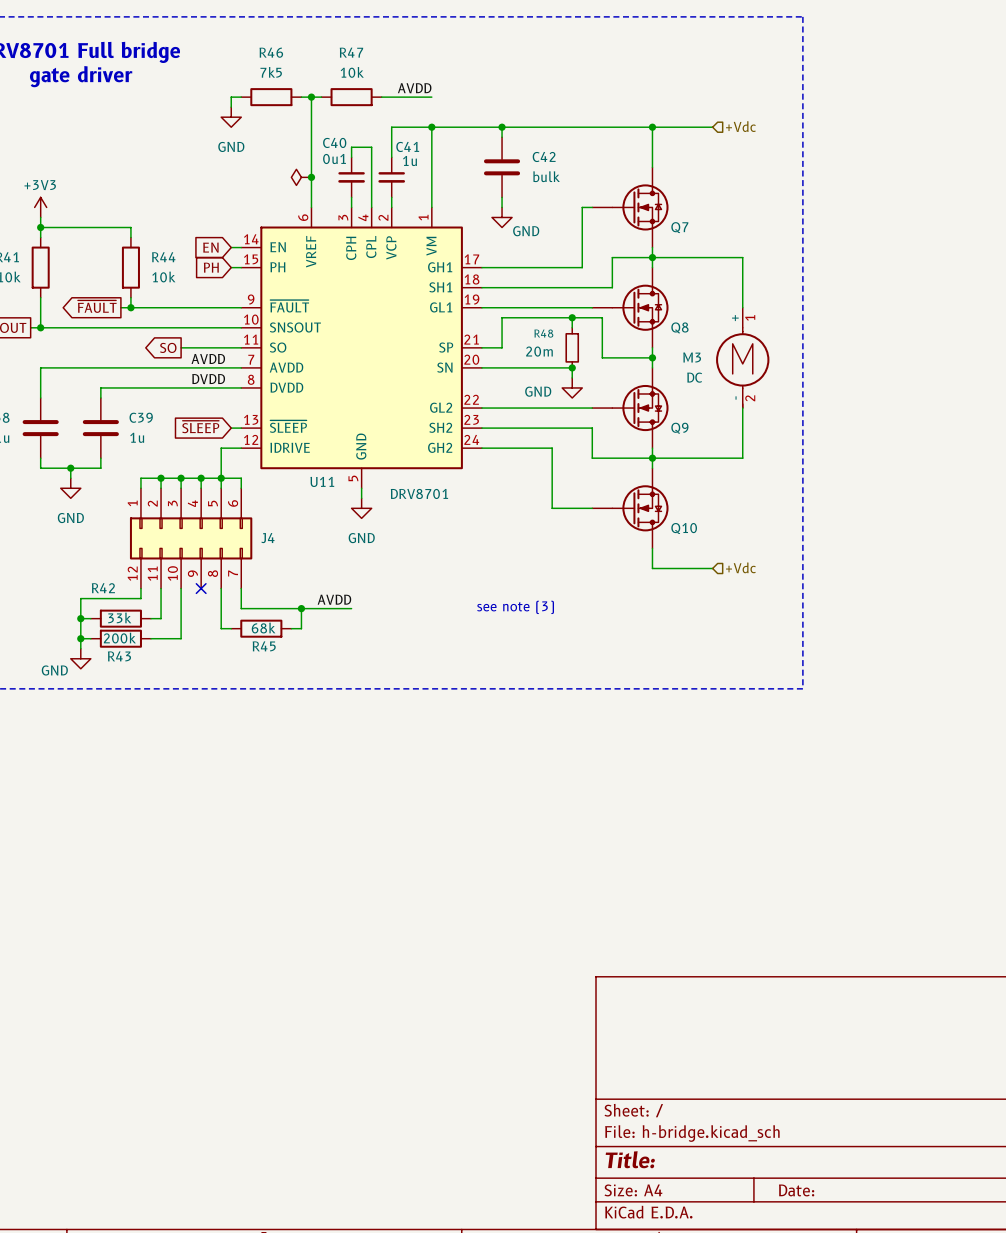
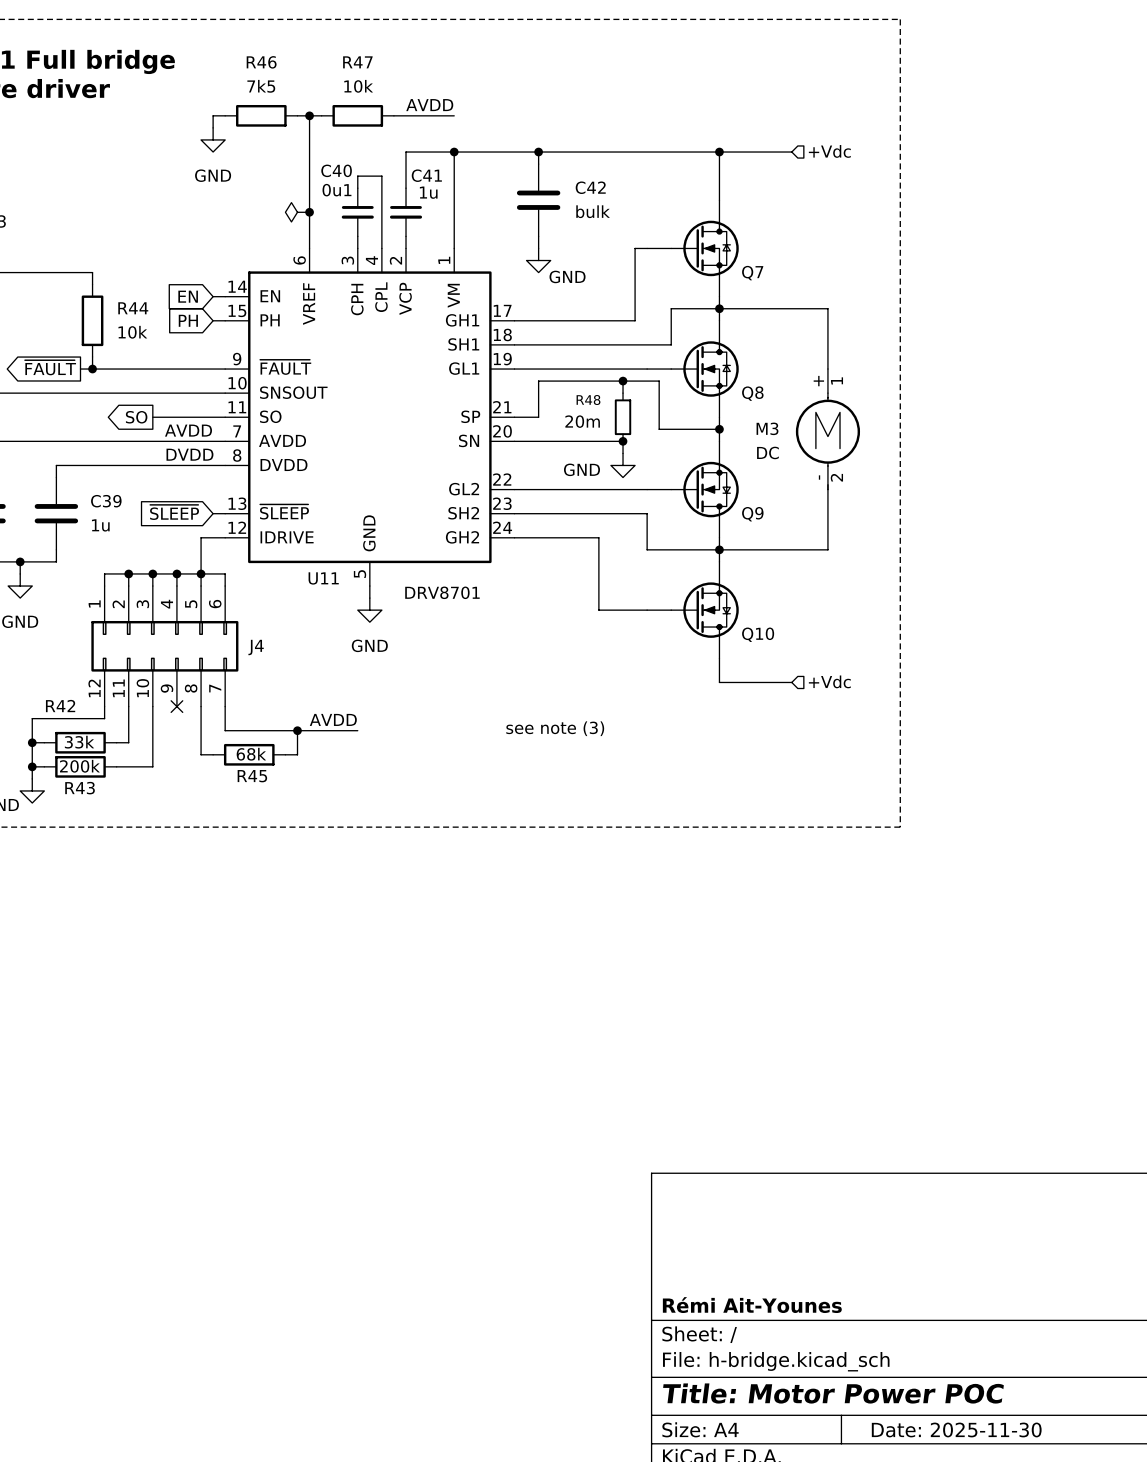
title block: none -> Rémi Ait-Younes (752, 1305)
title block: Title: (630, 1159) -> Title: Motor Power POC (833, 1393)
title block: Date: (796, 1190) -> Date: 2025-11-30 (956, 1429)

